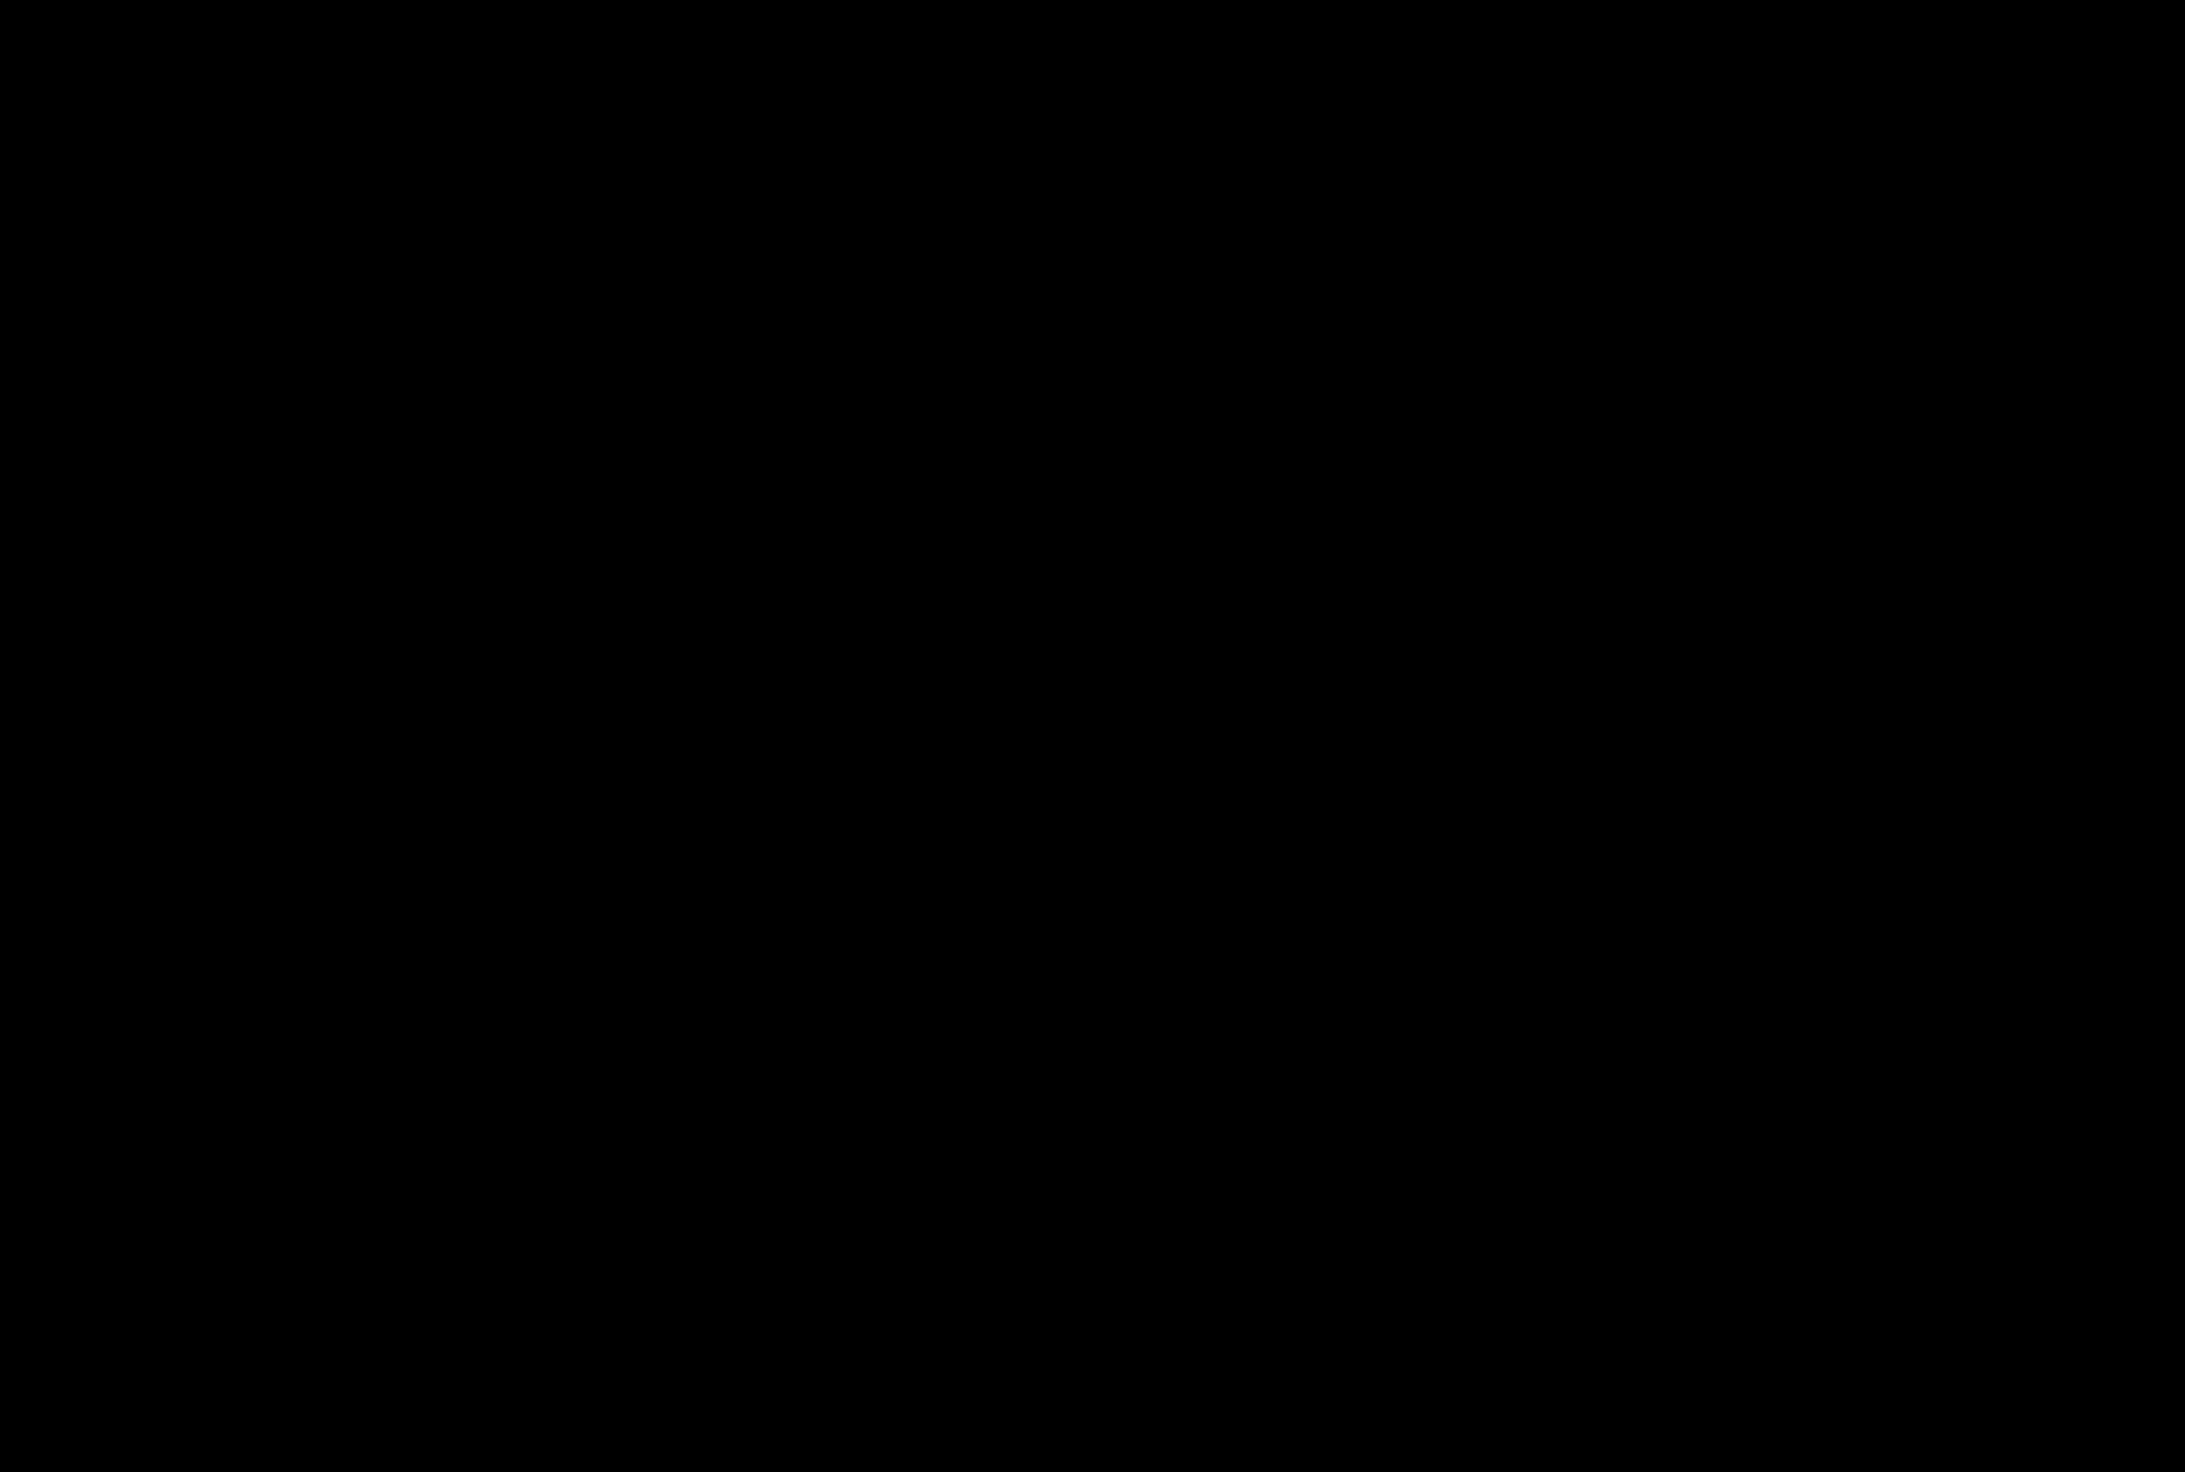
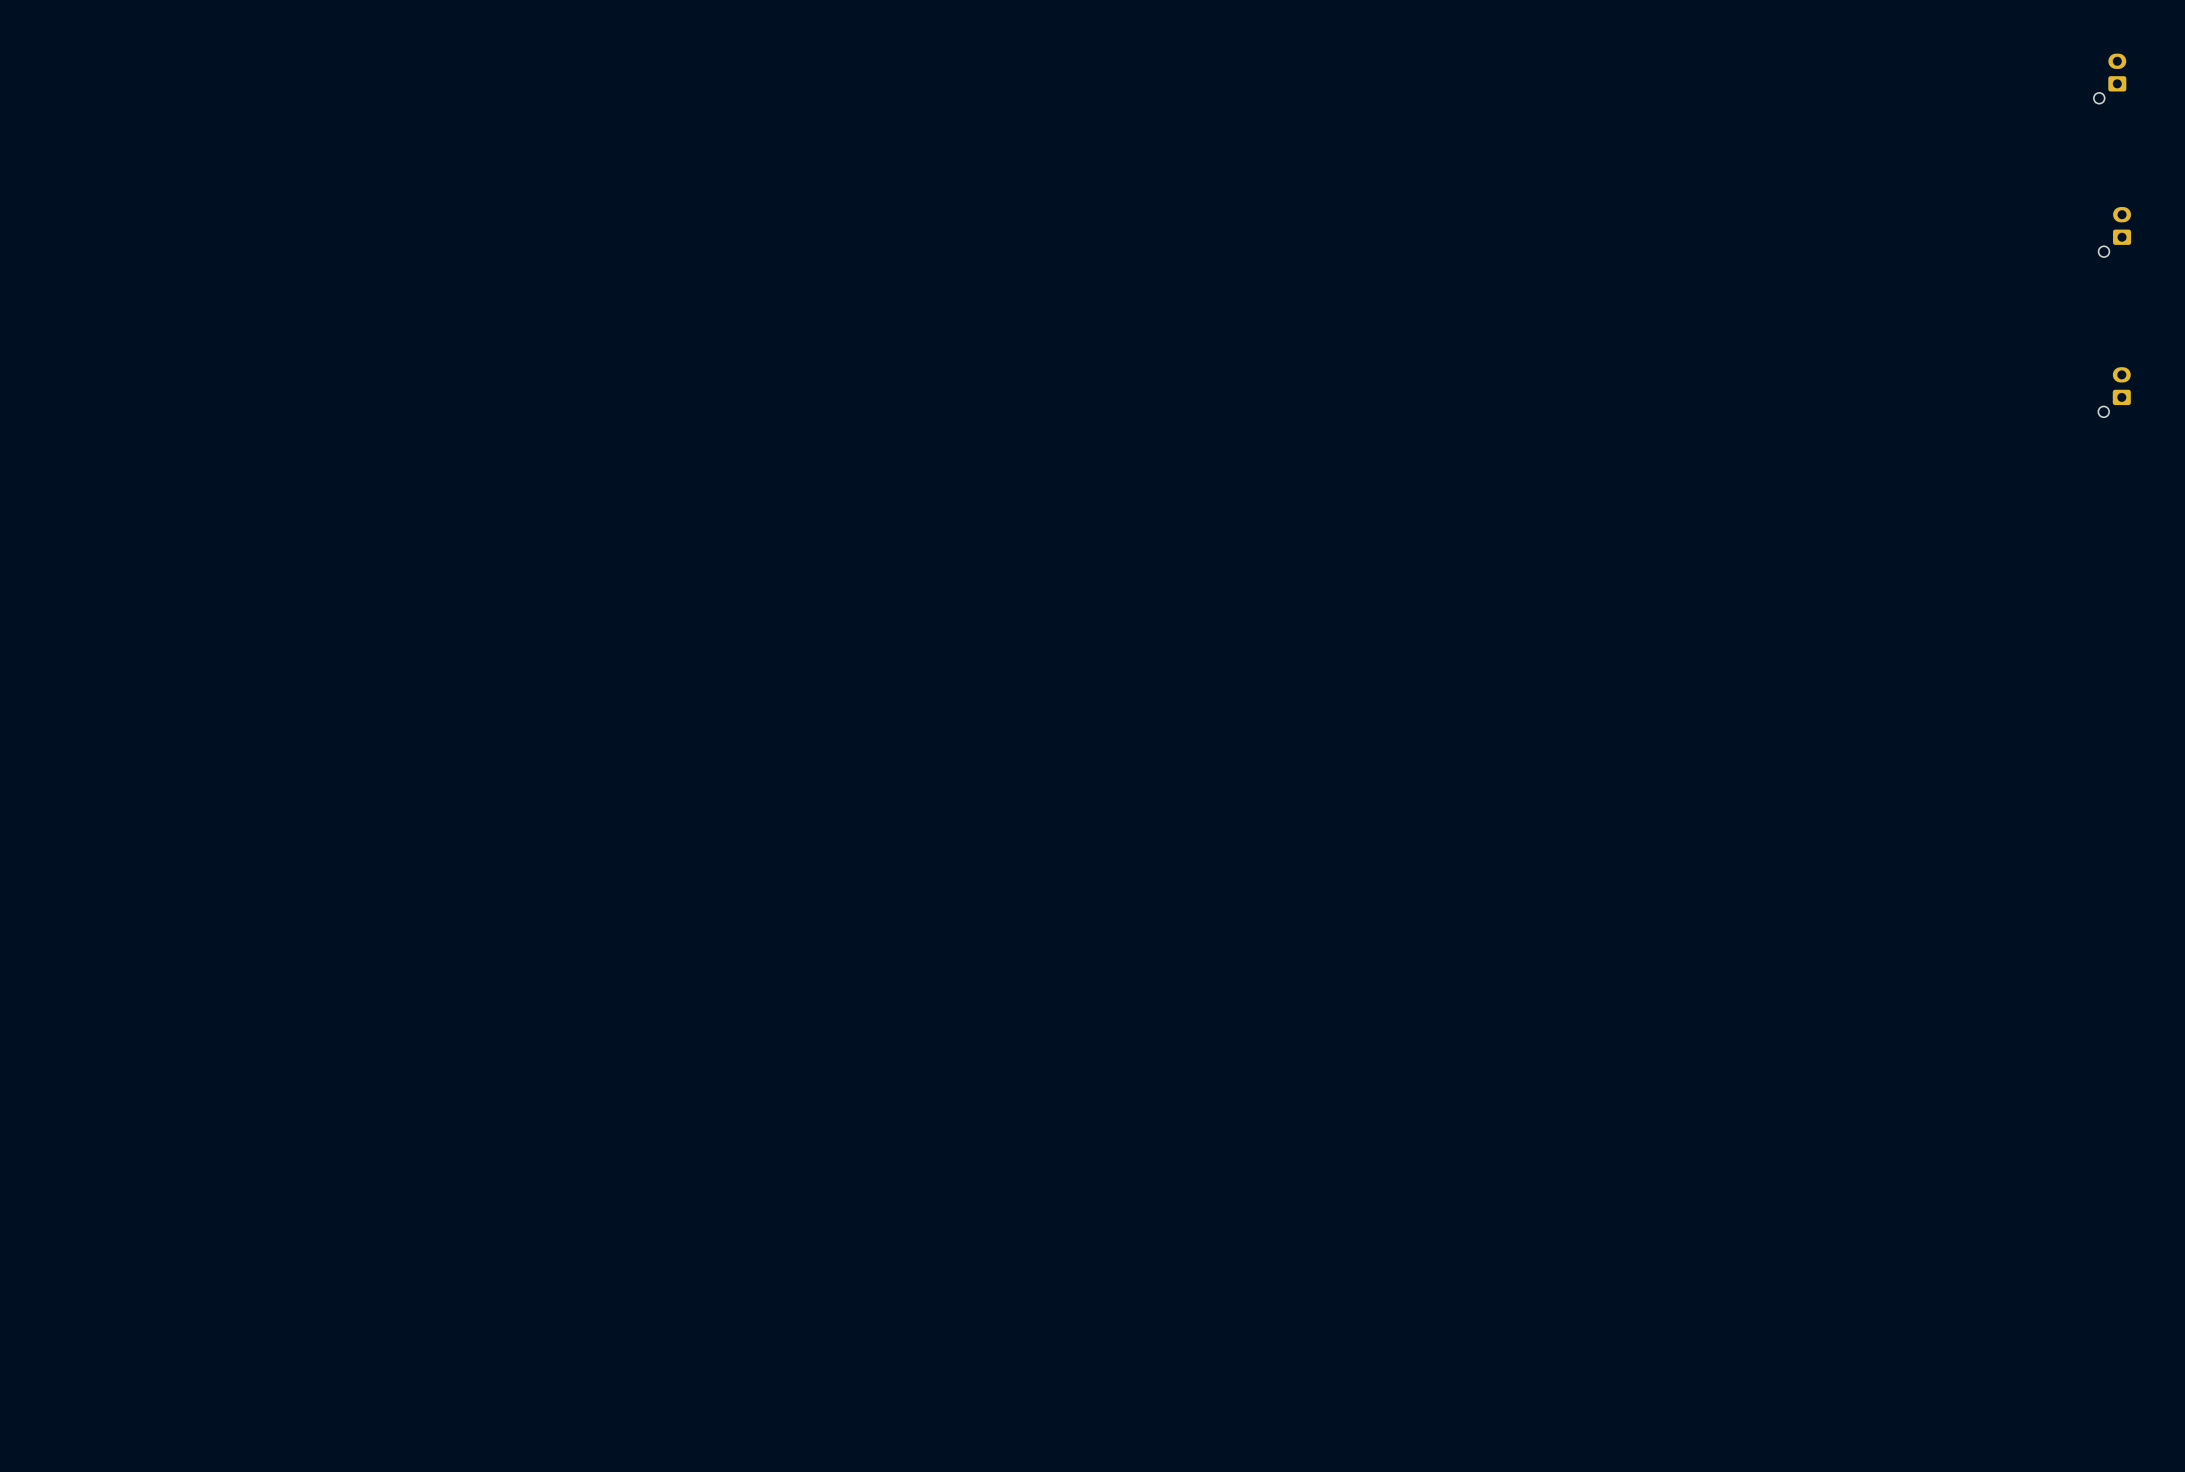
part: none -> (2110, 78)
part: none -> (2114, 232)
part: none -> (2114, 392)

